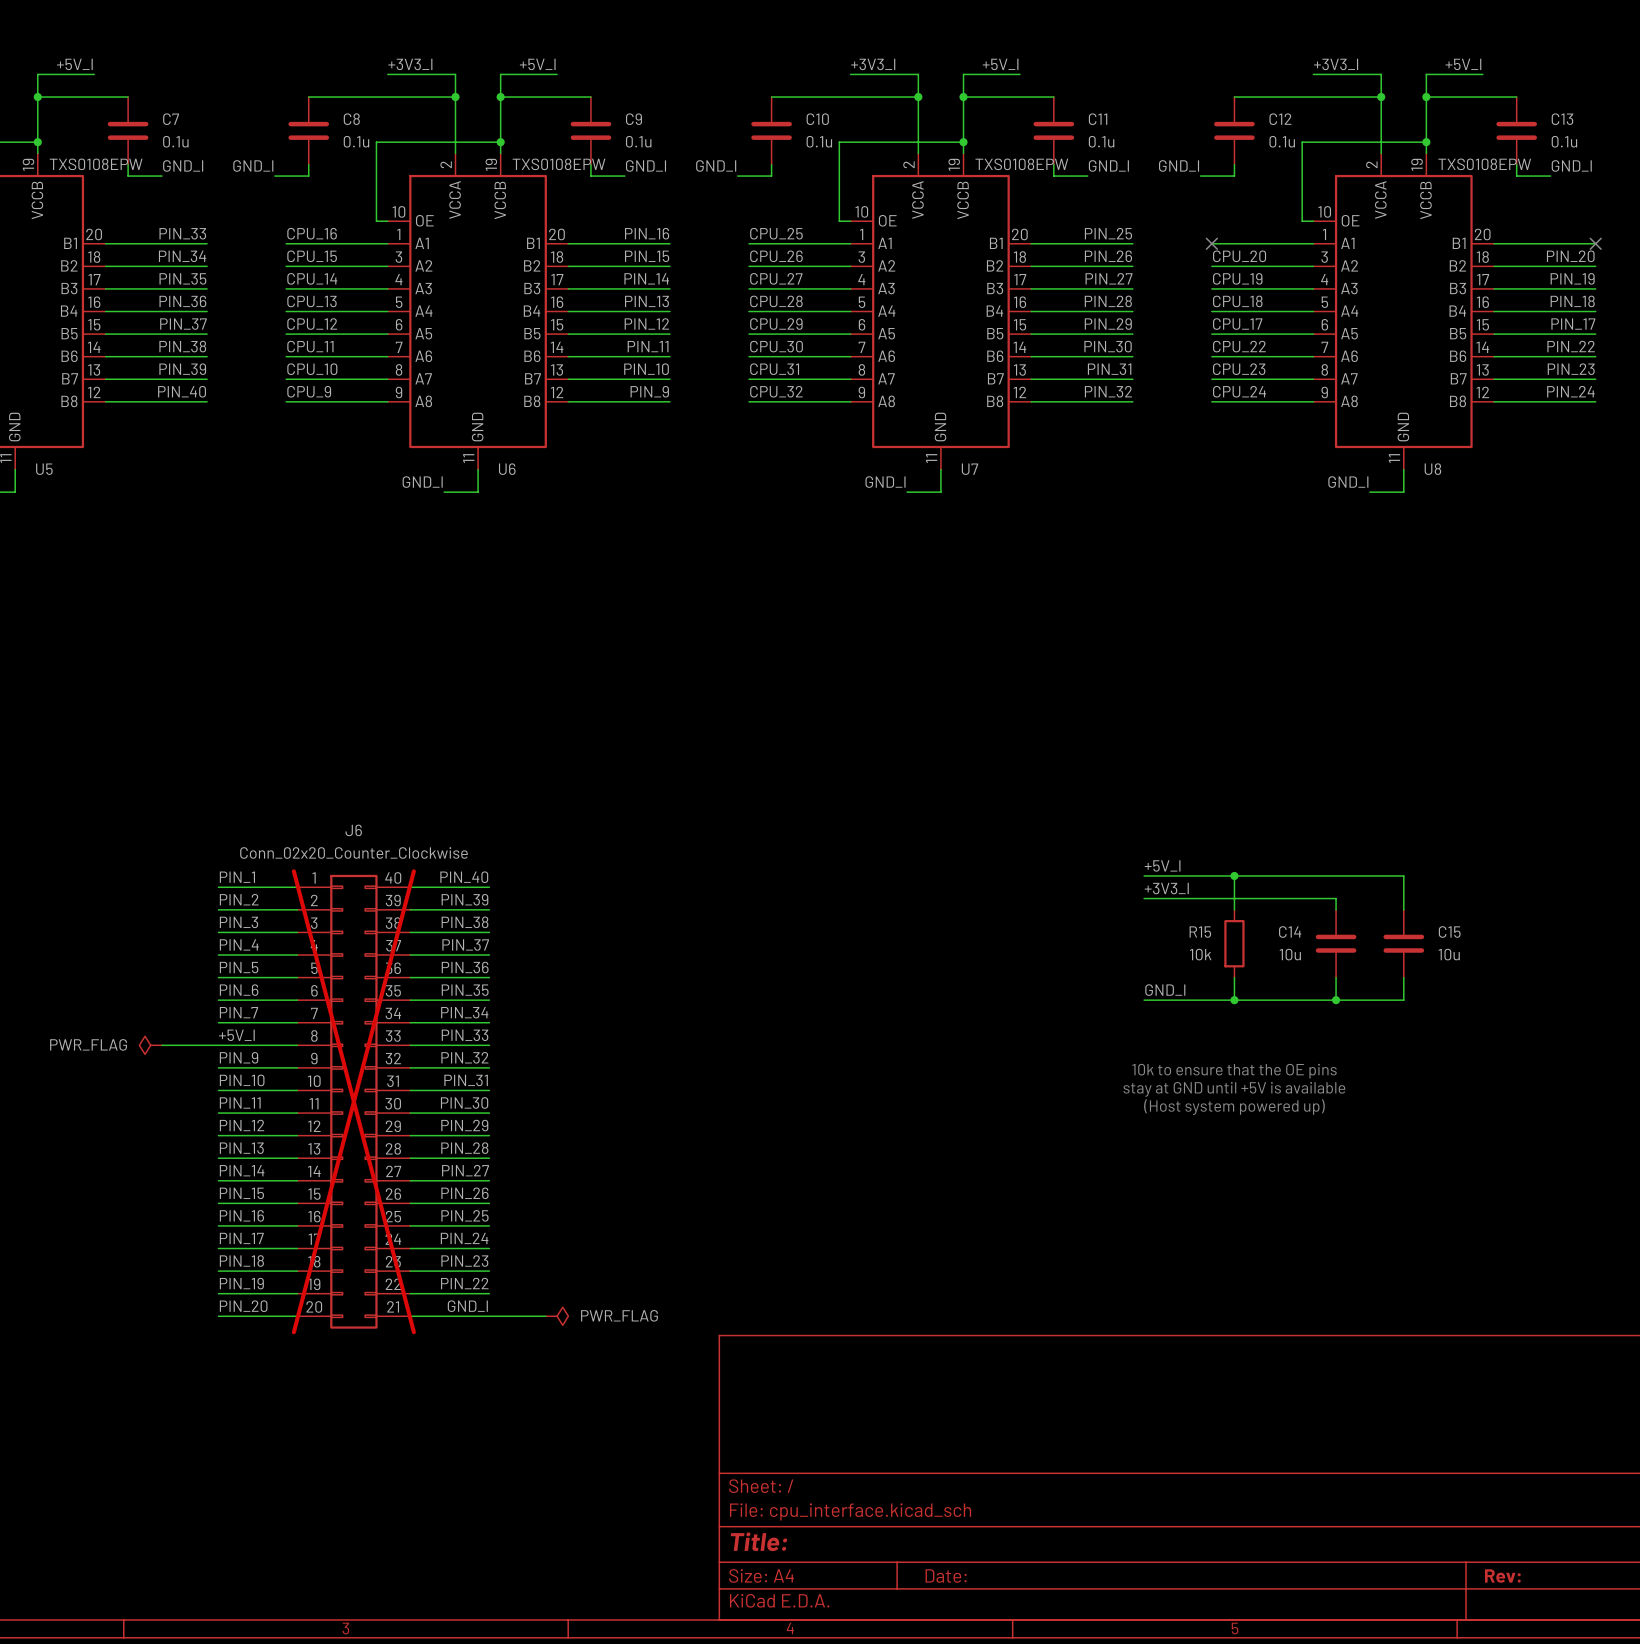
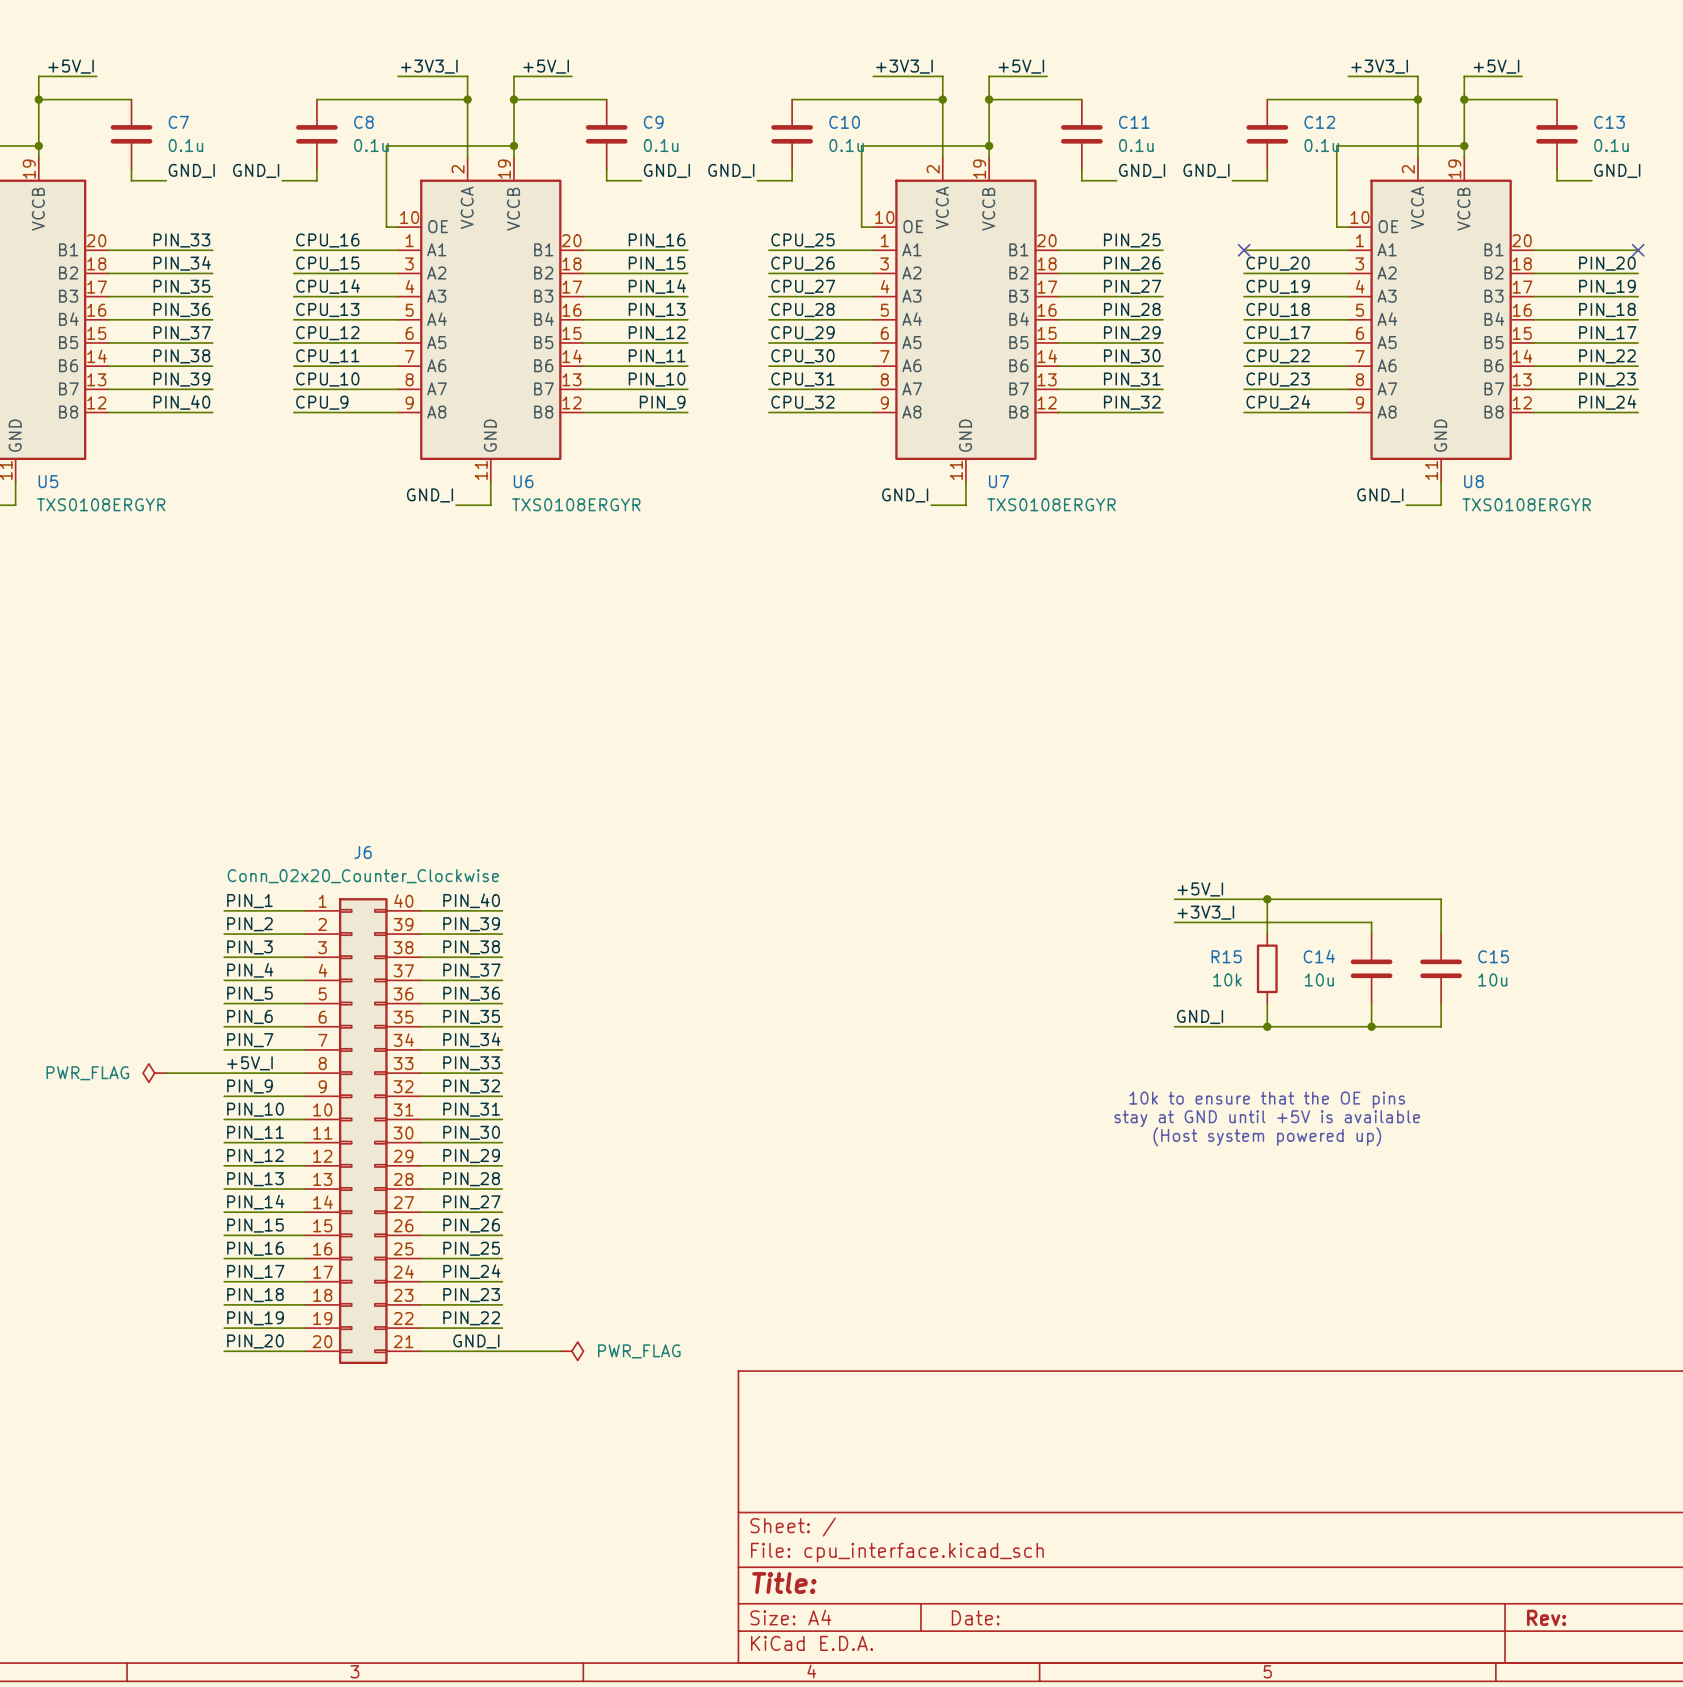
U5 value: TXS0108EPW (96, 164) -> TXS0108ERGYR (101, 504)
U6 value: TXS0108EPW (558, 164) -> TXS0108ERGYR (576, 504)
U7 value: TXS0108EPW (1021, 164) -> TXS0108ERGYR (1051, 504)
U8 value: TXS0108EPW (1484, 164) -> TXS0108ERGYR (1526, 504)
J6 do-not-place cross: (353, 1101) -> none

